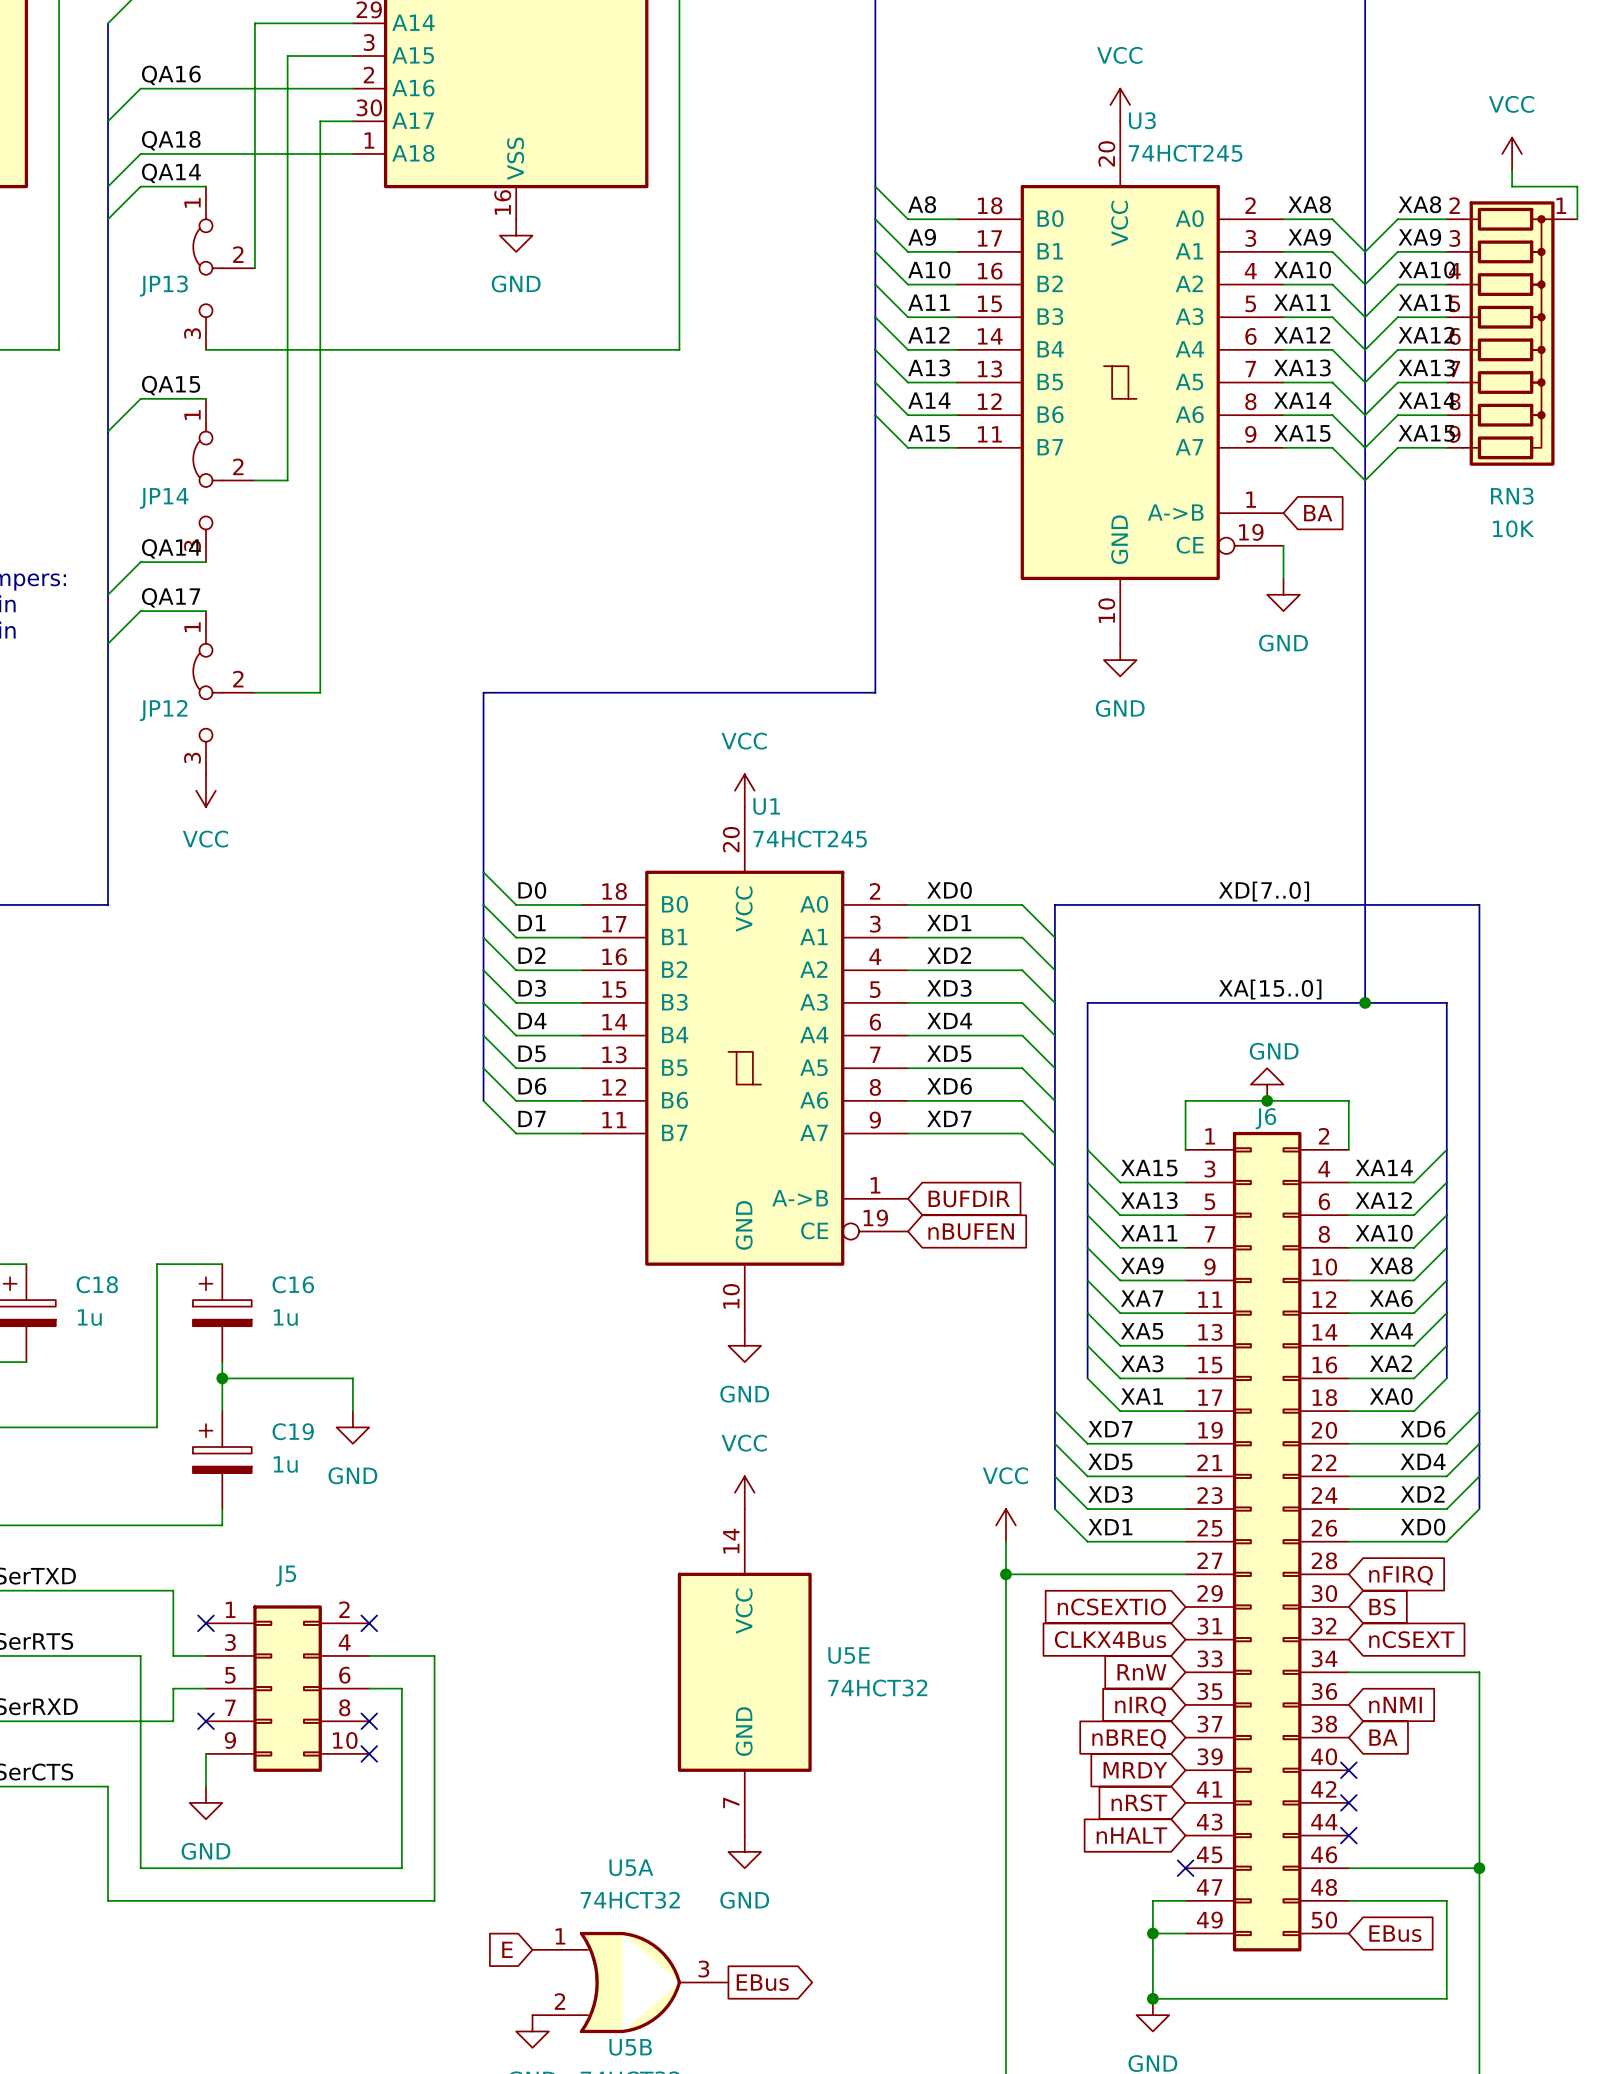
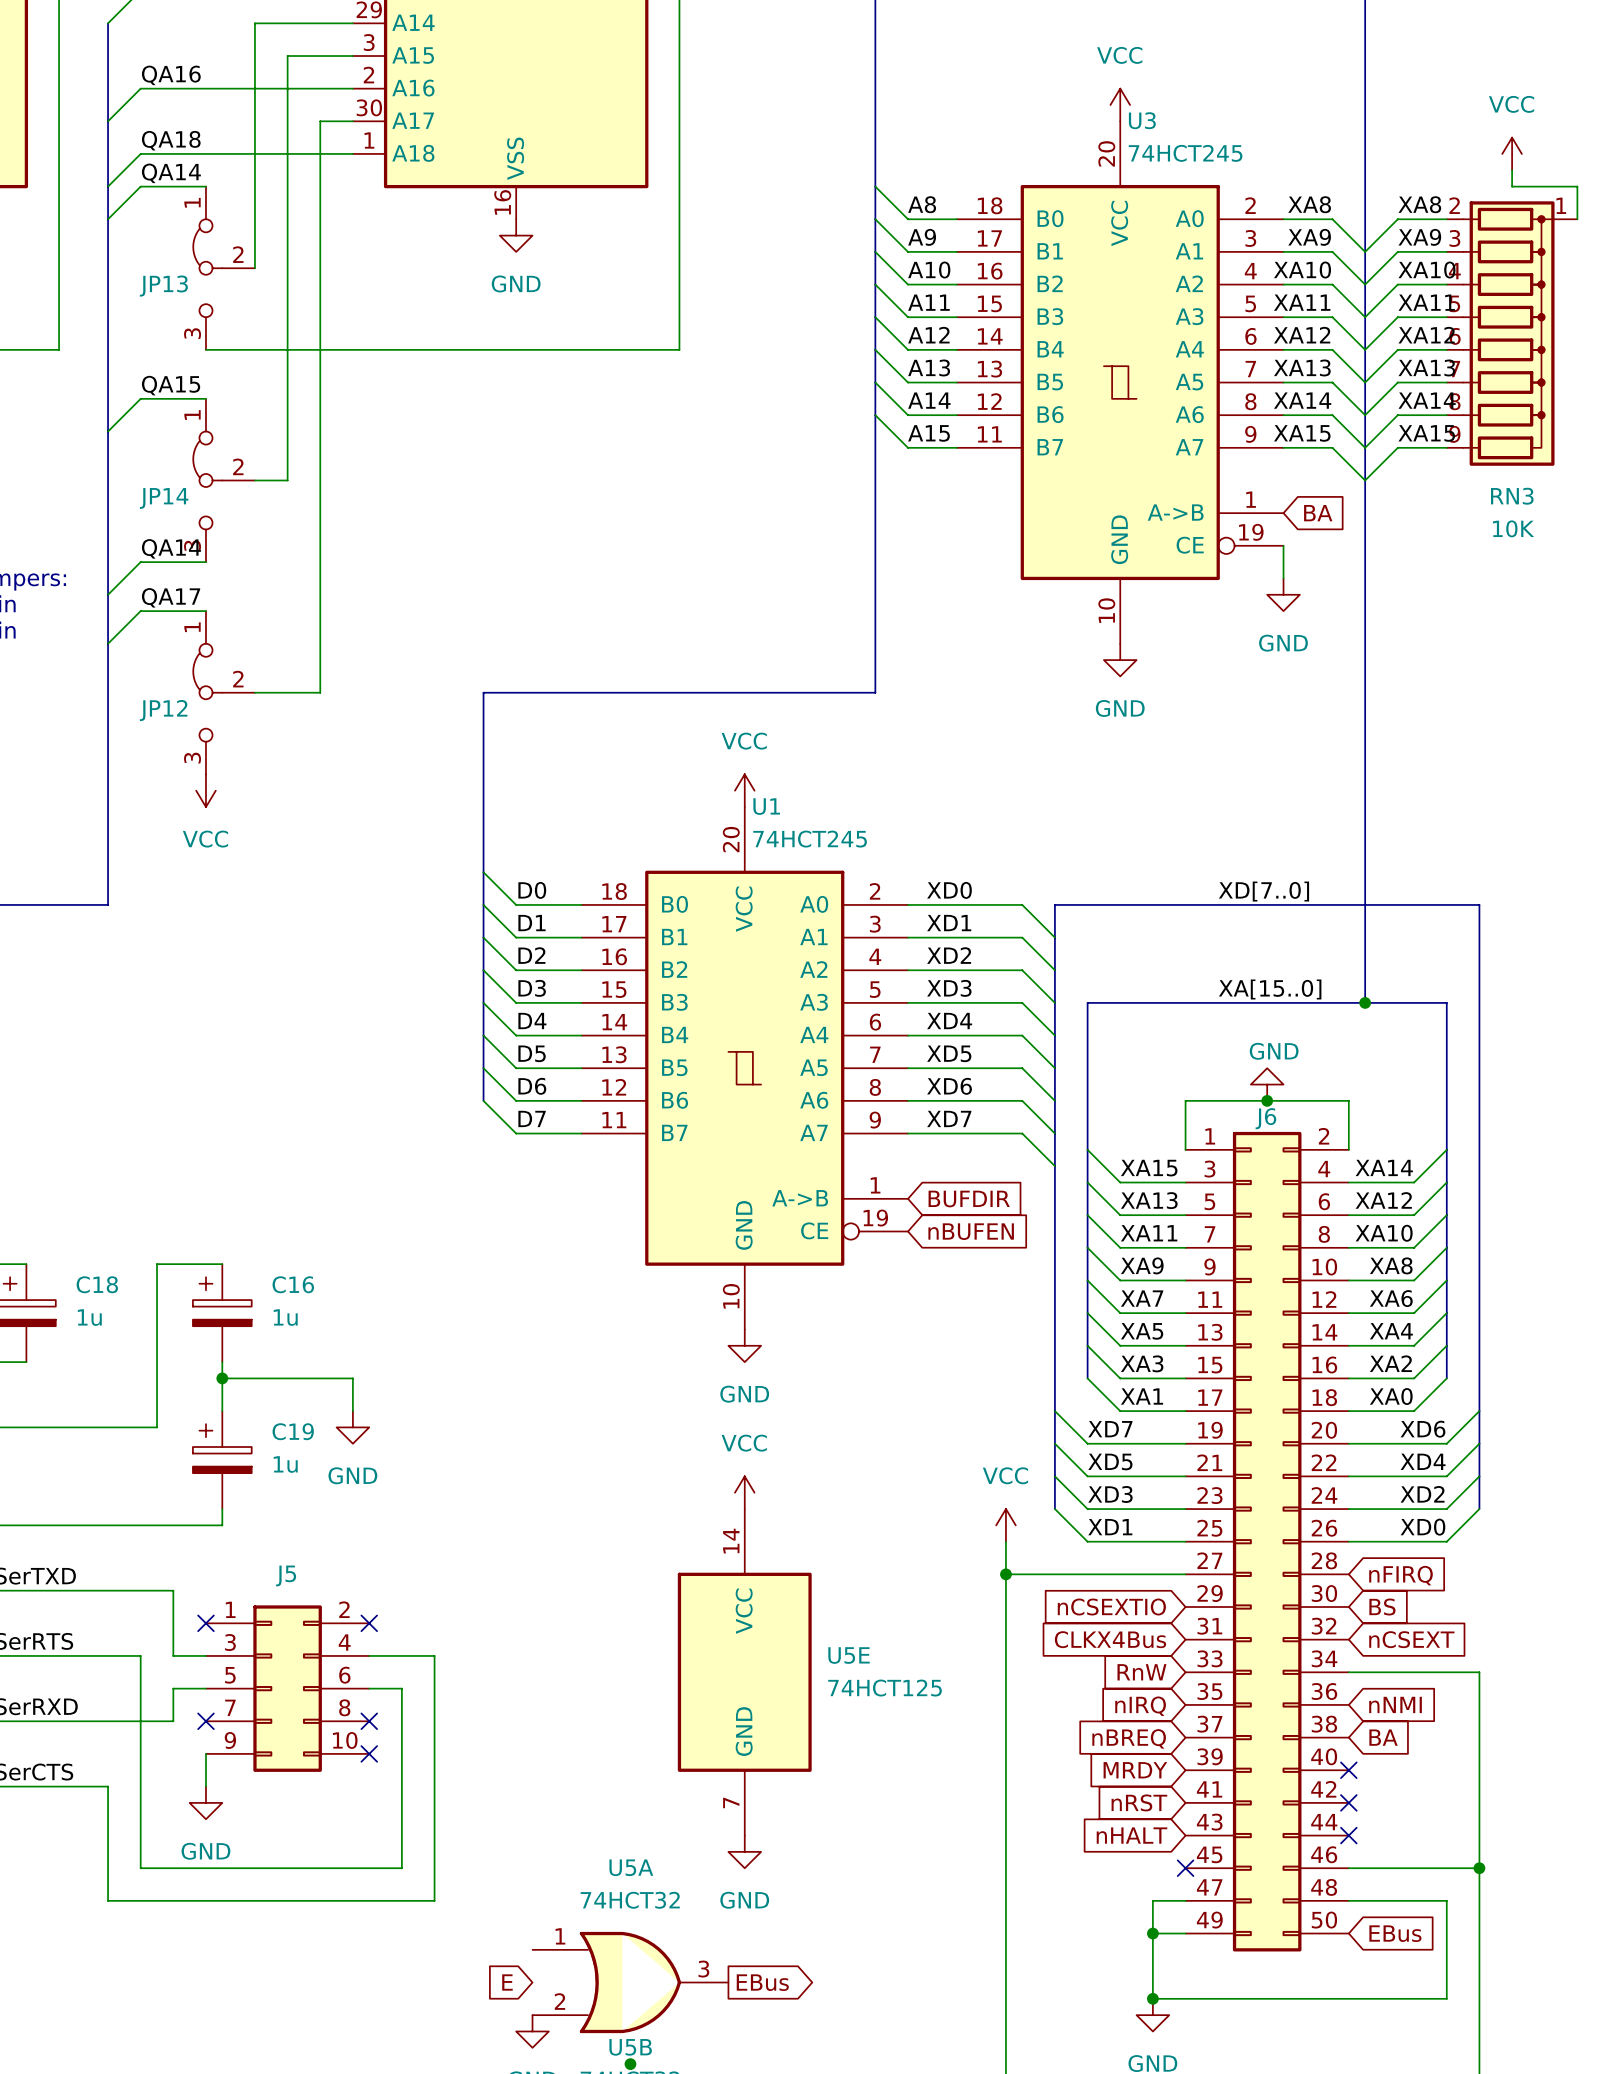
U5E value: 74HCT32 (877, 1688) -> 74HCT125 (885, 1688)
global label position: E (507, 1949) -> E (507, 1982)
junction: none -> (630, 2064)

